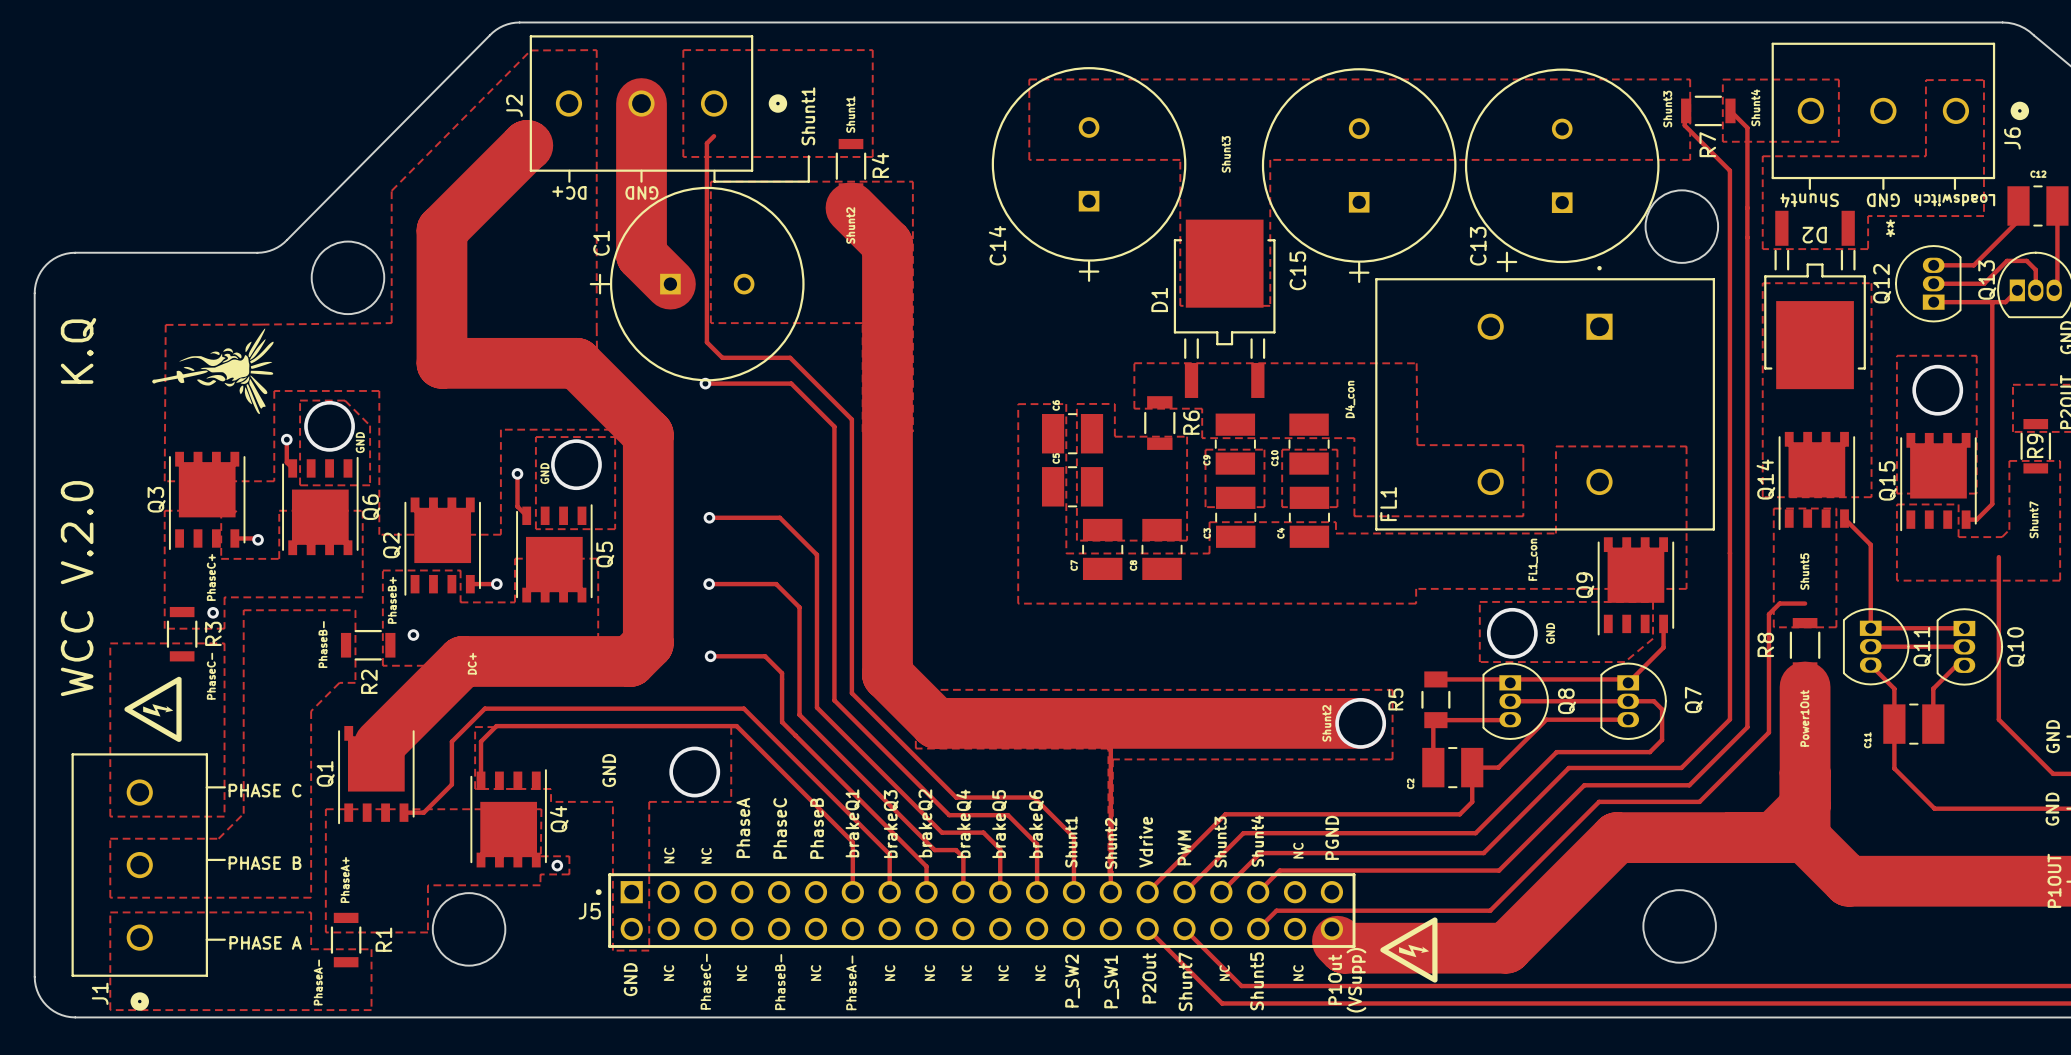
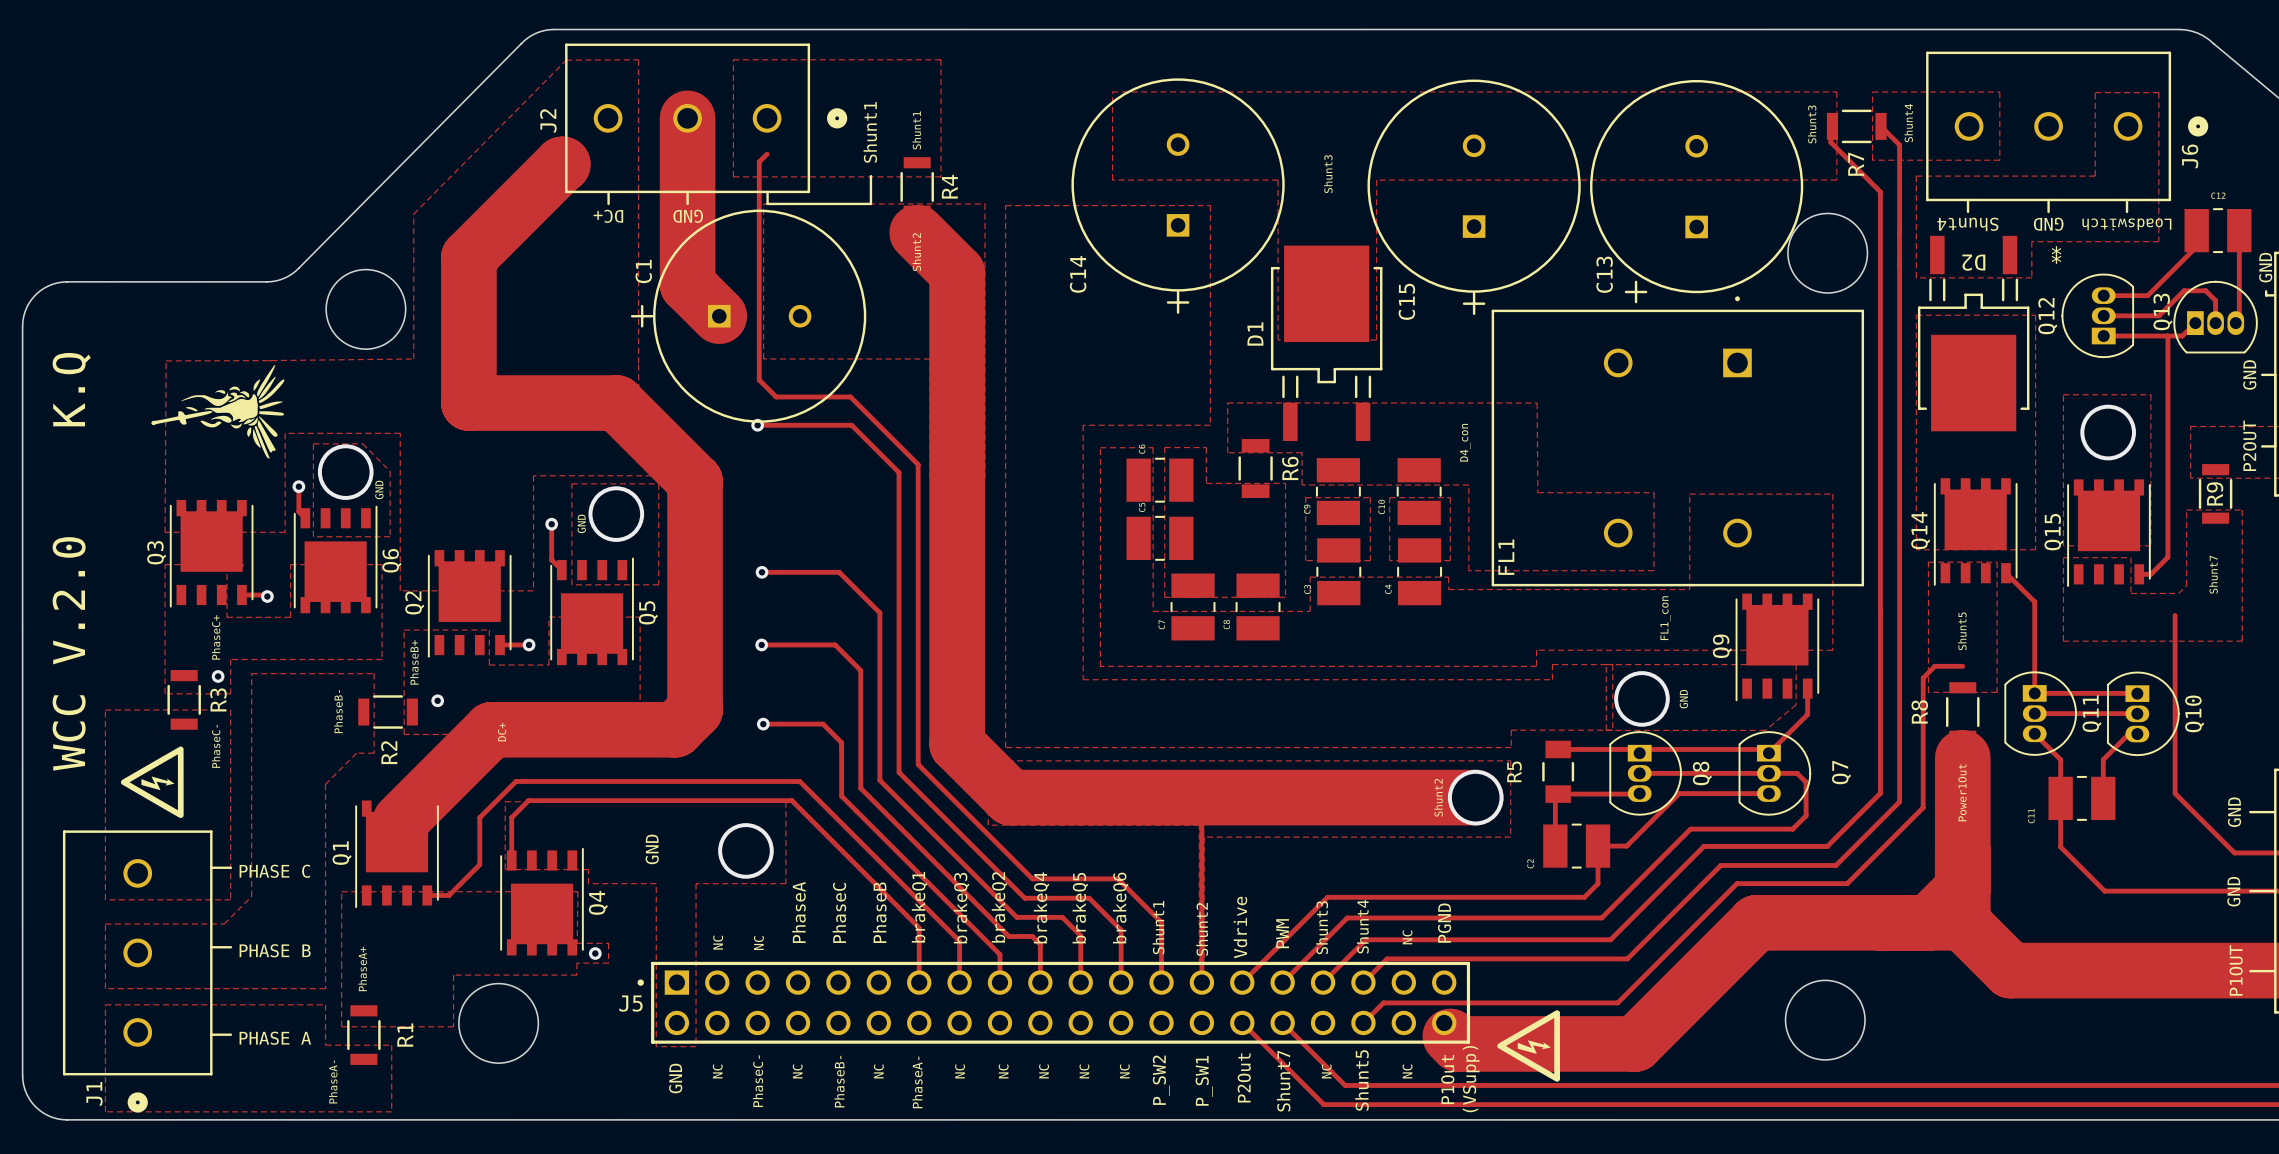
zone outline: none -> (1606, 664) (1552, 664) (1552, 679) (1083, 679) (1083, 425) (1210, 425) (1210, 205) (1005, 205) (1005, 747) (1511, 747) (1511, 730) (1612, 730) (1612, 664)

